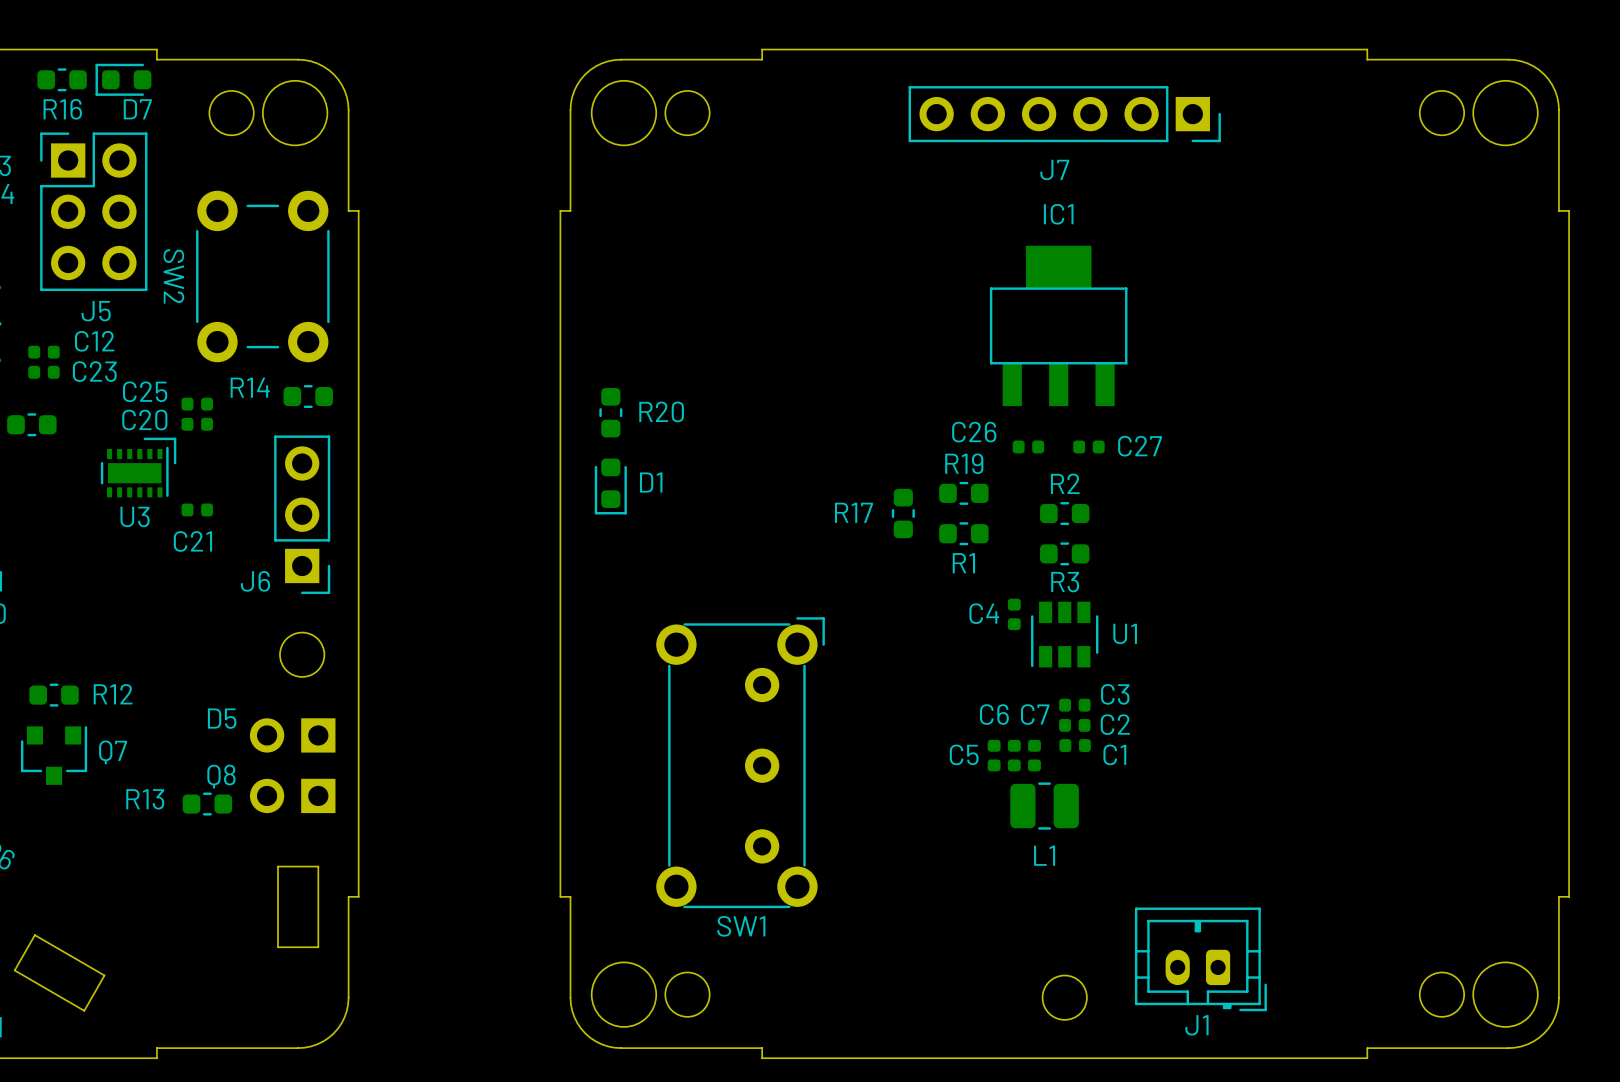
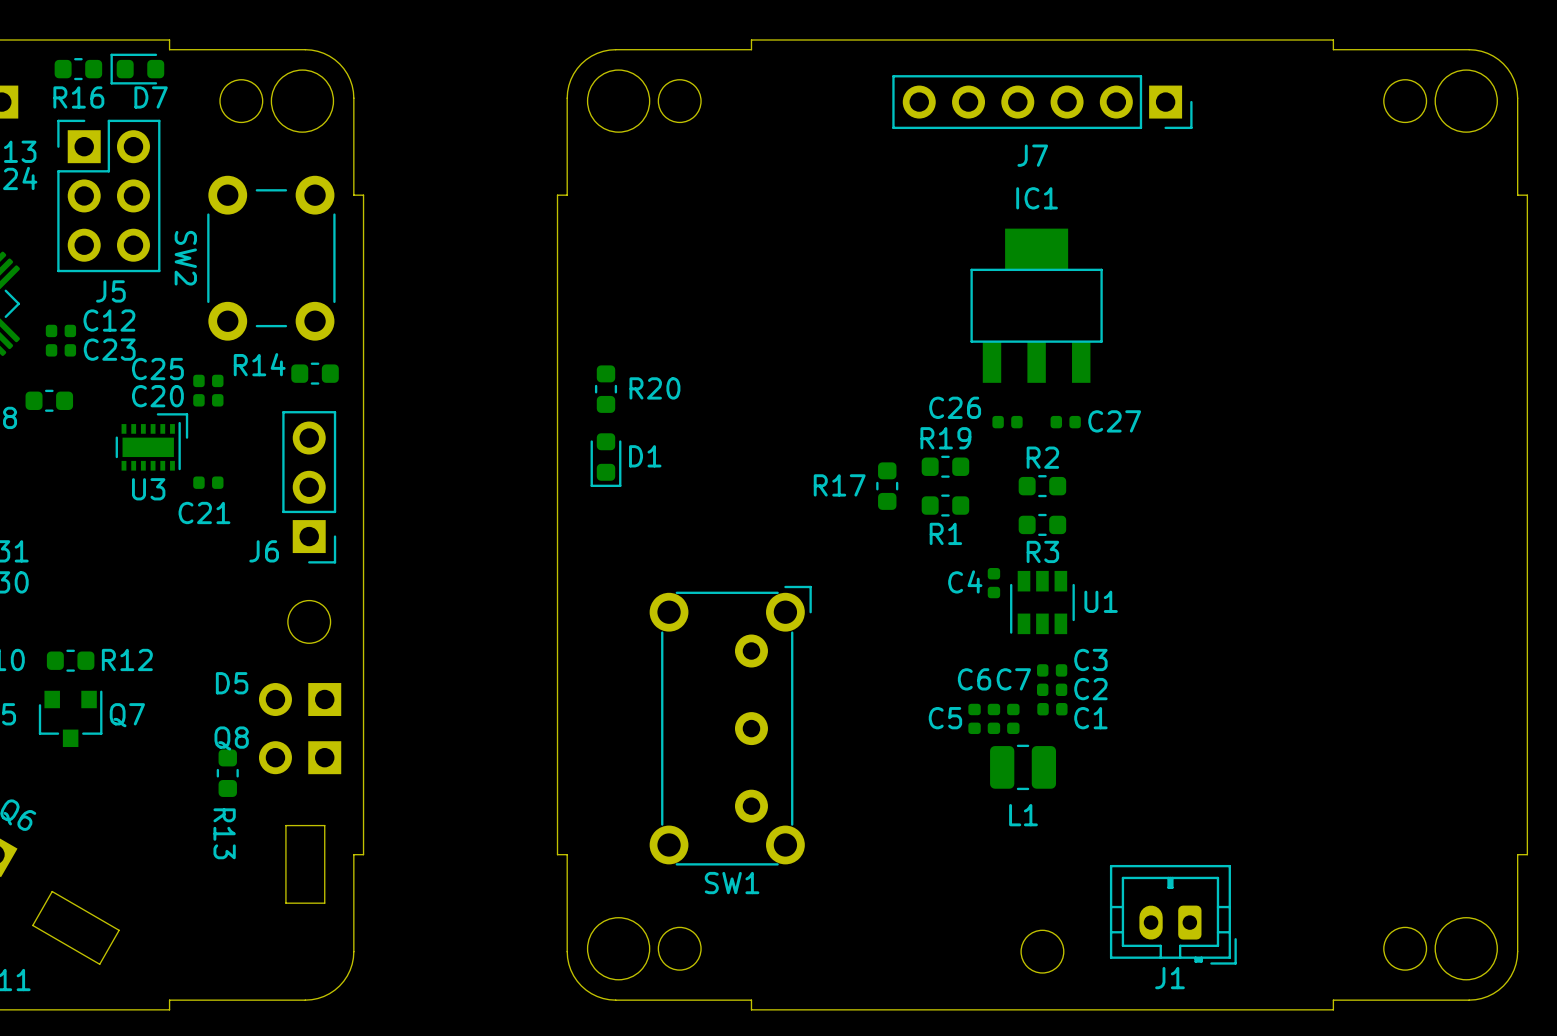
R13 name position: R13 (145, 799) -> R13 (224, 833)
R13 rotation: 0° (207, 804) -> 90° clockwise (227, 773)

